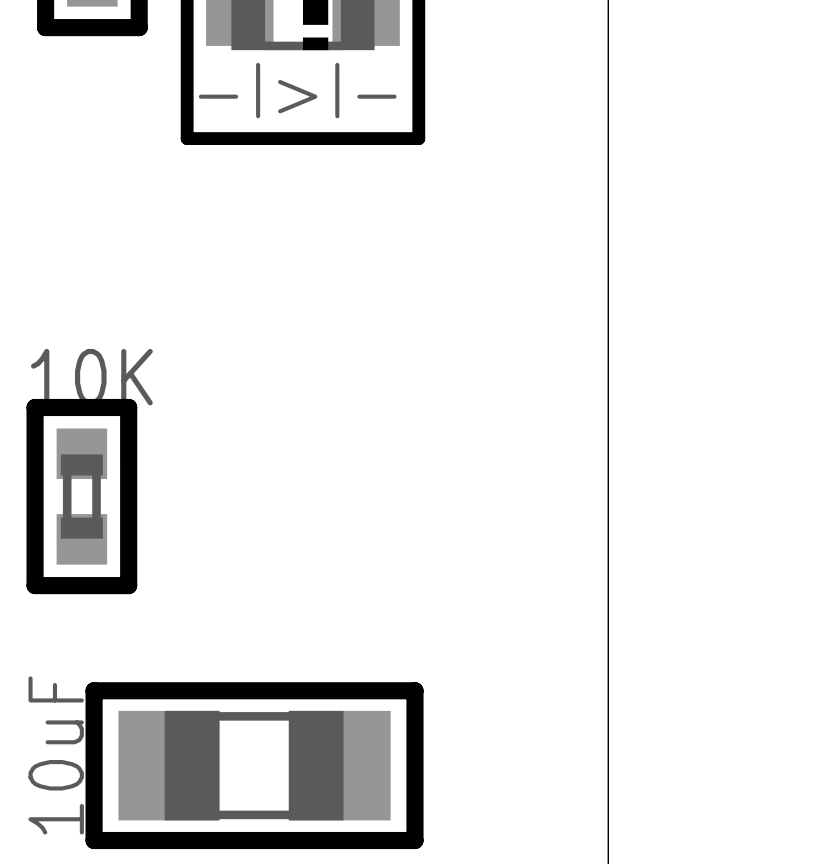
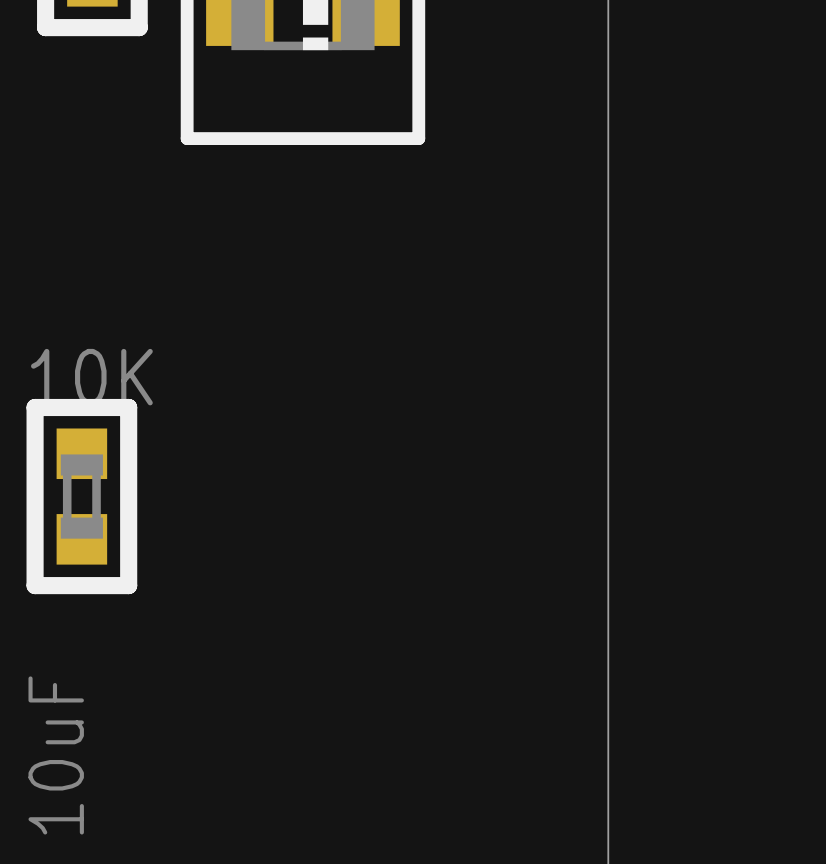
text: -I>I- (297, 90) -> none
part: (254, 765) -> none

